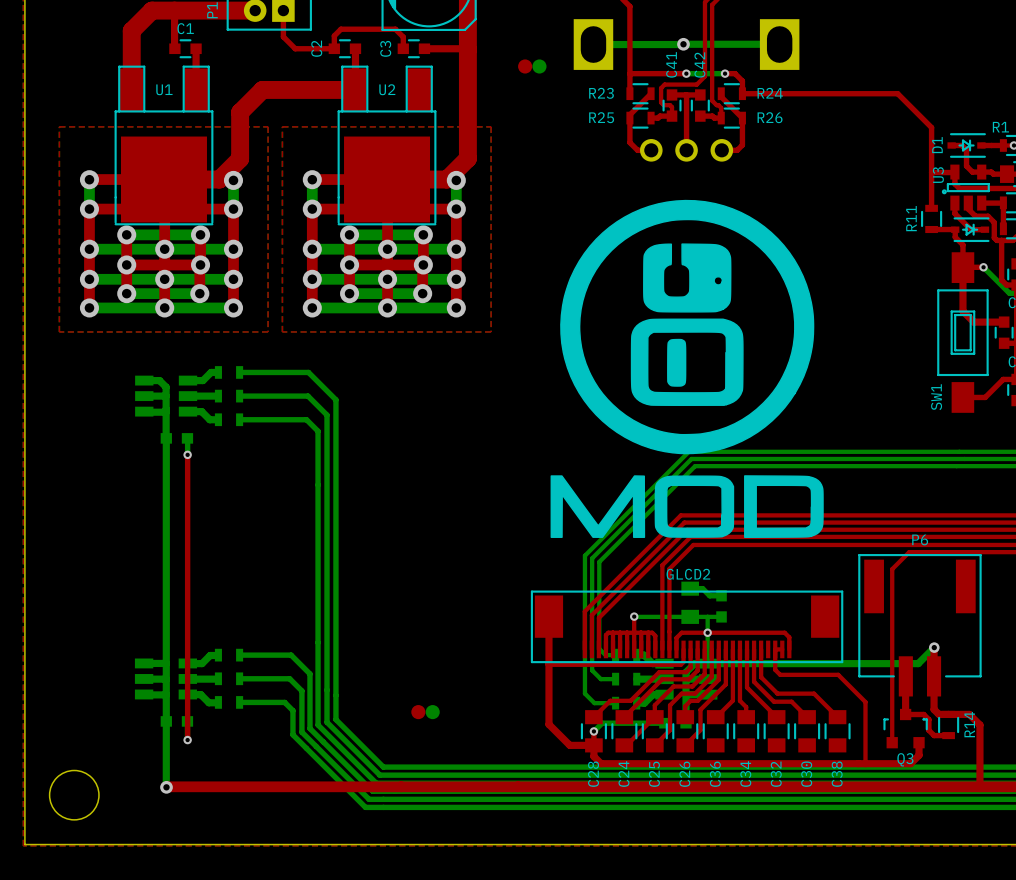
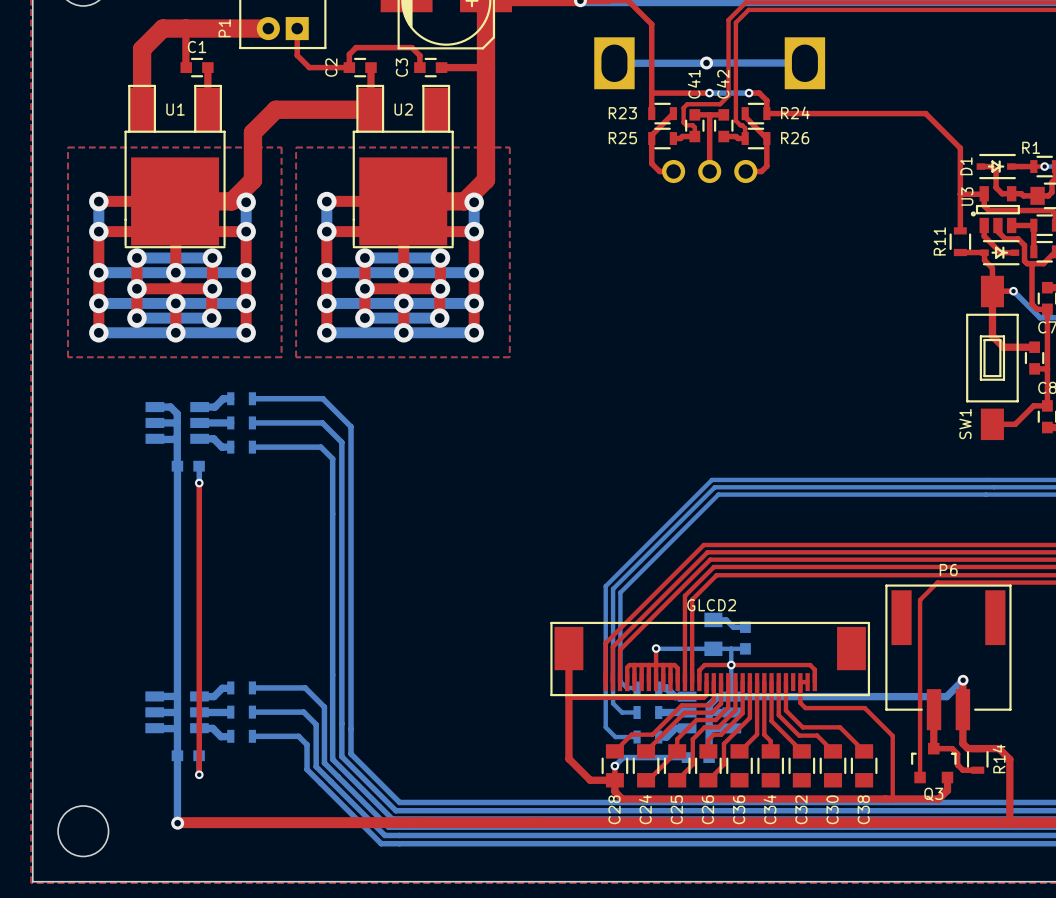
part: (525, 66) -> none
part: (539, 66) -> none
drawing: [550, 199, 824, 539] -> none
part: (418, 712) -> none
part: (432, 712) -> none

